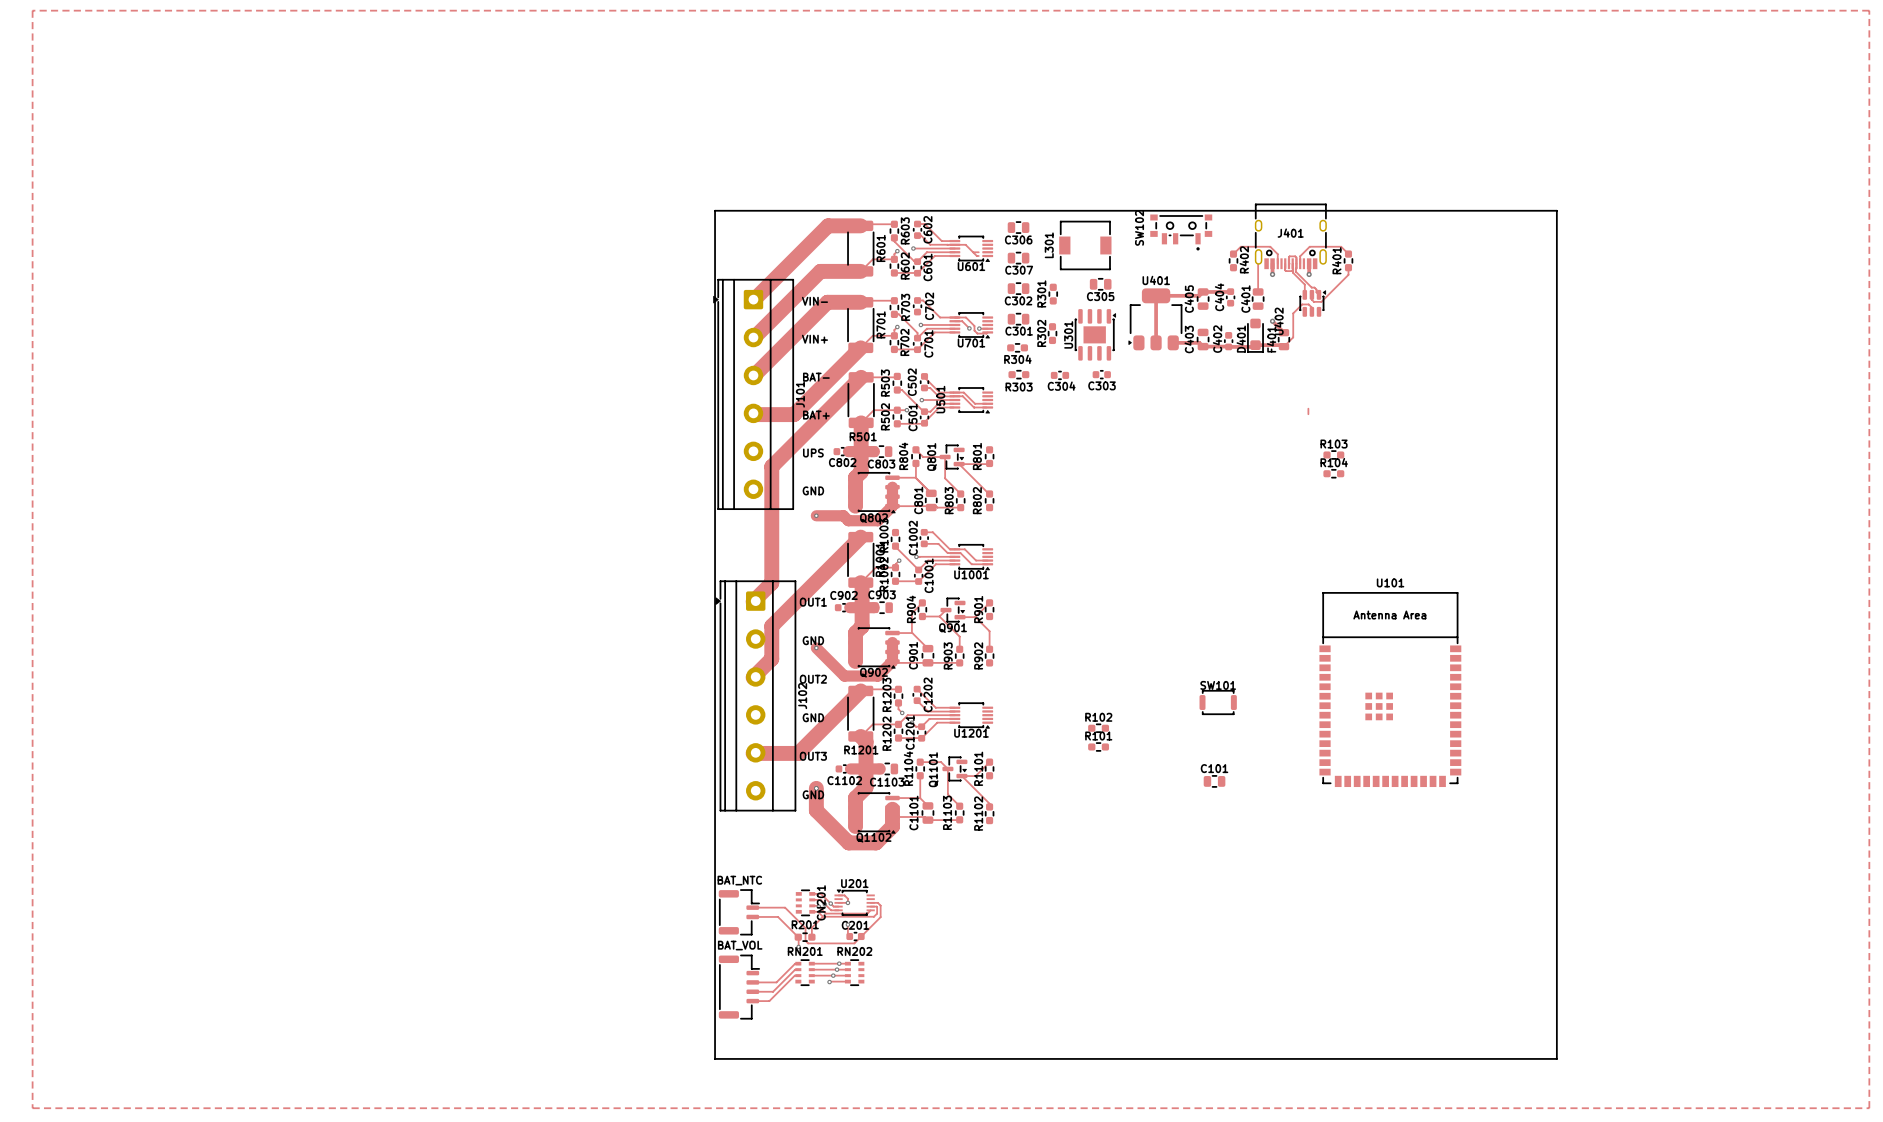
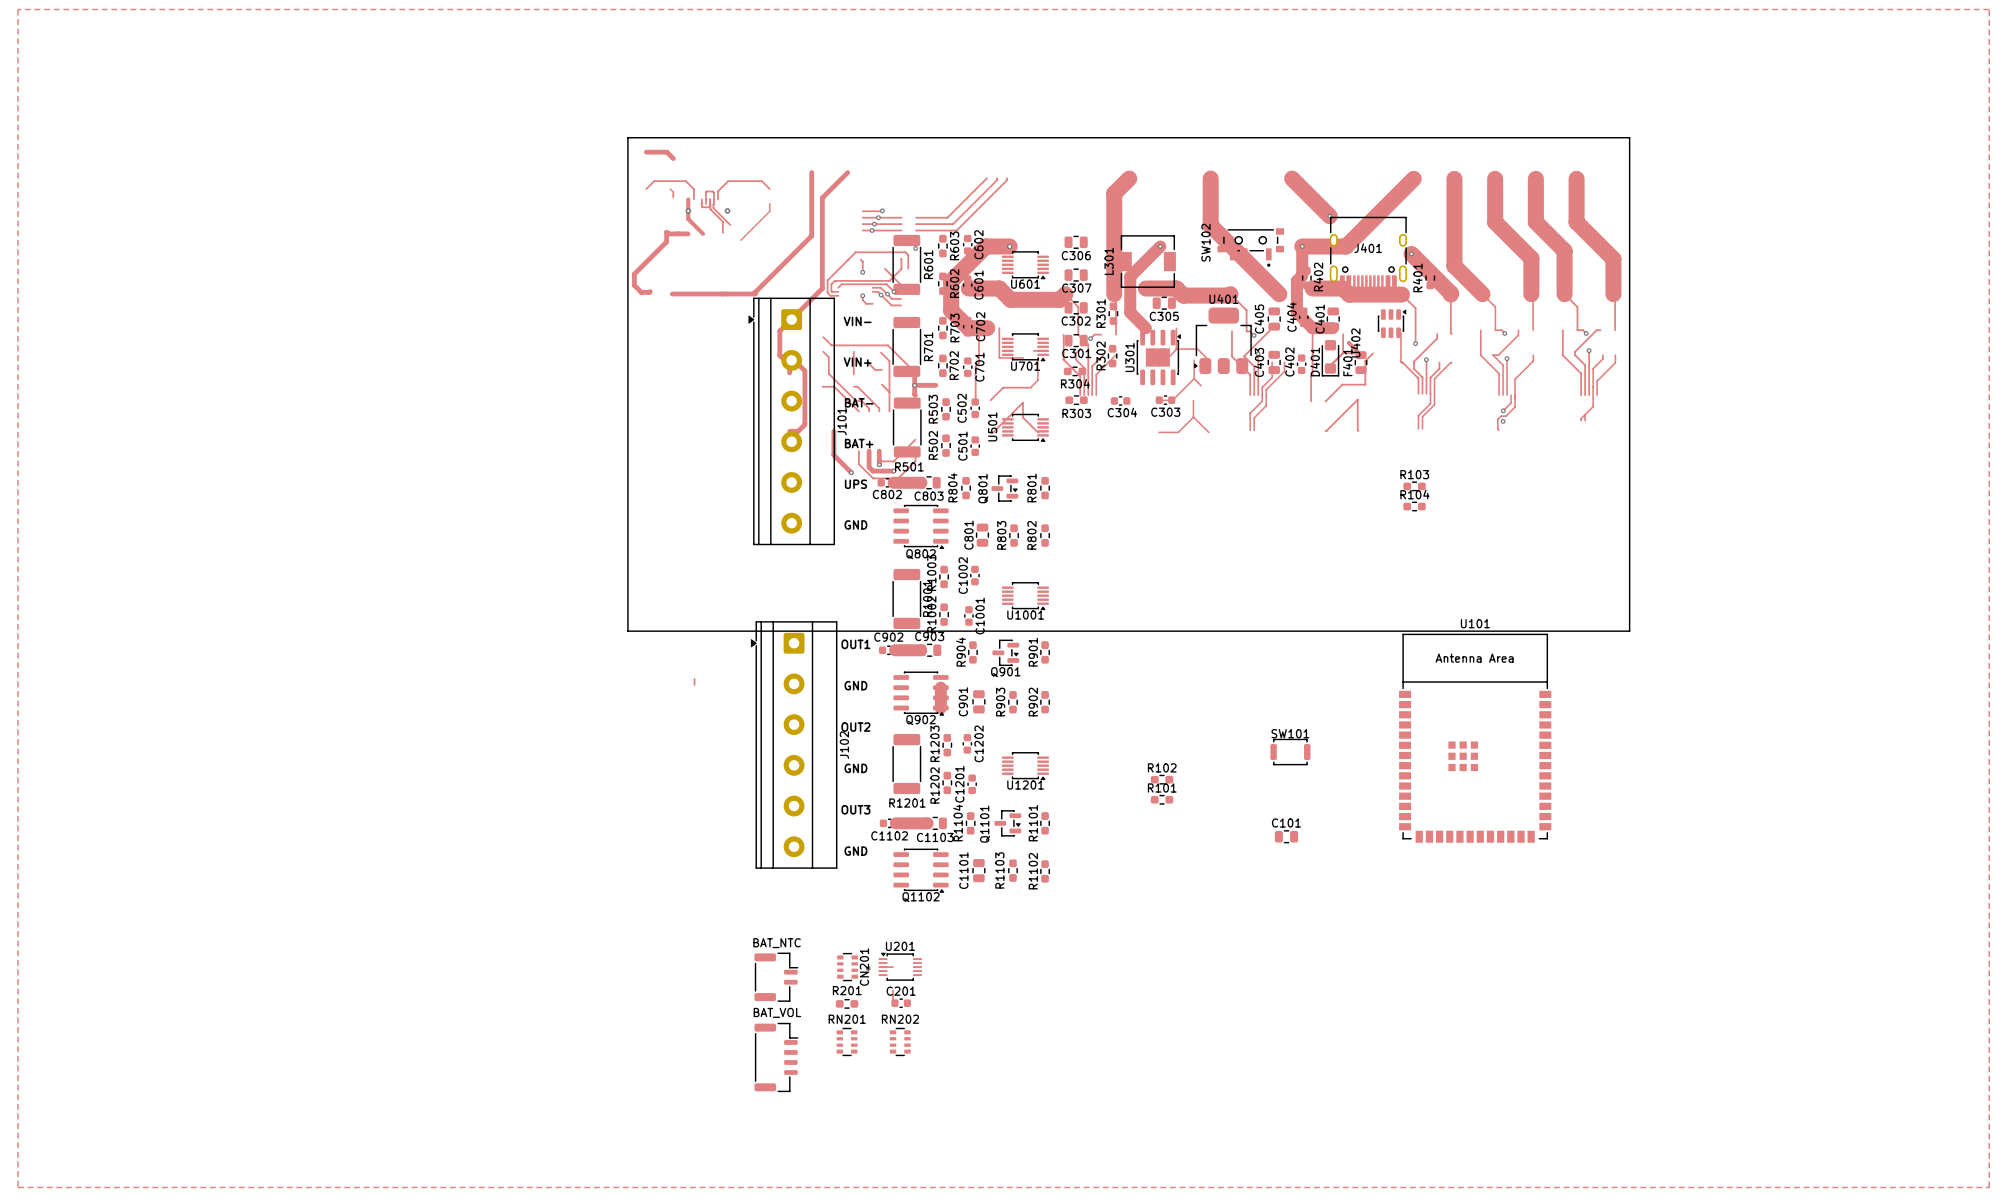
board edge: none -> (627, 137) (1629, 137) (1629, 631) (627, 631) (627, 137)
track: none -> (646, 152) (666, 152) (673, 158)
track: none -> (811, 172) (811, 235) (755, 293) (672, 293)
track: none -> (847, 172) (822, 198) (822, 288) (779, 331) (779, 355) (789, 365) (789, 372)
track: none -> (986, 178) (947, 217) (915, 217)
track: none -> (997, 178) (953, 224) (915, 224)
track: none -> (1007, 178) (956, 230) (915, 230)
track: none -> (1129, 178) (1114, 193) (1115, 334)
track: none -> (1210, 178) (1210, 225) (1279, 294)
track: none -> (1292, 178) (1329, 216)
track: none -> (1413, 178) (1346, 246) (1302, 246) (1302, 275) (1296, 280) (1296, 312) (1312, 328) (1332, 328)
track: none -> (1454, 178) (1454, 266) (1495, 307) (1495, 330) (1501, 330) (1504, 333)
track: none -> (1495, 178) (1495, 222) (1531, 258) (1531, 294)
track: none -> (1535, 178) (1535, 222) (1564, 250) (1564, 294) (1577, 307) (1577, 330) (1583, 330) (1586, 333)
track: none -> (1576, 178) (1576, 222) (1613, 259) (1613, 294)
track: none -> (646, 189) (654, 181) (685, 181) (693, 189) (693, 199)
track: none -> (670, 189) (673, 192) (673, 197)
track: none -> (769, 189) (761, 181) (728, 181) (717, 191) (717, 199)
track: none -> (688, 199) (688, 219) (703, 233)
track: none -> (701, 199) (702, 207) (709, 206) (709, 199)
track: none -> (705, 204) (705, 192) (712, 191) (713, 208) (730, 224)
track: none -> (709, 204) (710, 209) (722, 221) (722, 232)
track: none -> (769, 203) (769, 211) (740, 240)
via: none -> (688, 210)
via: none -> (727, 210)
track: none -> (882, 210) (862, 211)
via: none -> (882, 210)
via: none -> (1329, 216)
track: none -> (862, 217) (901, 217)
via: none -> (878, 217)
board edge: (715, 210) (1556, 210) (1556, 1058) (715, 1058) (715, 210) -> none
track: none -> (862, 224) (901, 224)
via: none -> (874, 224)
track: none -> (862, 230) (901, 230)
via: none -> (872, 230)
track: none -> (688, 233) (666, 232) (666, 241) (634, 274) (634, 285) (641, 292) (650, 291)
track: (862, 224) (894, 224) -> none
track: (917, 224) (924, 224) (941, 241) (954, 241) -> none
track: (860, 225) (828, 225) (753, 300) -> none
track: none -> (1009, 246) (985, 246) (951, 281) (951, 310) (968, 328) (987, 328)
via: none -> (1009, 246)
track: none -> (1160, 246) (1130, 276) (1130, 312) (1145, 328)
via: none -> (1160, 246)
via: none -> (1302, 246)
via: none -> (915, 248)
track: (917, 235) (921, 235) (930, 244) (947, 244) -> none
track: (894, 237) (894, 241) (914, 261) (917, 261) (926, 252) (954, 252) -> none
track: none -> (1411, 253) (1450, 293) (1451, 334)
via: none -> (1411, 253)
track: none -> (860, 259) (862, 261) (862, 272)
track: none -> (901, 259) (901, 269) (889, 280) (834, 280) (831, 284) (831, 291) (838, 291)
track: (947, 244) (965, 244) (978, 255) -> none
track: (913, 248) (954, 248) -> none
via: (913, 248) -> none
track: (897, 251) (894, 254) (894, 259) (872, 259) (860, 271) (820, 271) (753, 338) -> none
via: (897, 251) -> none
track: none -> (884, 268) (906, 290)
track: none -> (908, 268) (908, 255) (905, 252) (855, 252) (827, 280) (827, 292) (830, 295) (838, 295)
track: (973, 252) (978, 252) -> none
track: (1233, 254) (1240, 246) (1270, 246) (1277, 254) (1277, 263) -> none
track: (1348, 254) (1341, 246) (1309, 246) (1300, 256) (1300, 263) -> none
via: none -> (862, 272)
track: (954, 255) (934, 255) (917, 273) (894, 272) -> none
track: (1258, 256) (1258, 291) -> none
track: (1348, 267) (1348, 274) (1321, 301) (1313, 301) (1311, 294) -> none
track: (1288, 268) (1288, 257) (1295, 256) (1295, 271) (1311, 287) (1314, 287) (1318, 294) -> none
track: (1292, 268) (1293, 272) (1304, 284) (1304, 294) -> none
track: none -> (838, 287) (841, 284) (886, 284) (894, 292) (901, 292)
track: none -> (872, 287) (880, 287) (892, 299) (901, 299)
track: none -> (968, 288) (999, 288) (1010, 299) (1059, 299) (1065, 294) (1078, 307) (1078, 334) (1088, 344) (1088, 395)
track: none -> (1145, 288) (1176, 288) (1183, 295) (1230, 294) (1246, 310) (1246, 331) (1250, 331) (1254, 335)
track: none -> (1312, 288) (1343, 288) (1349, 294) (1401, 294) (1415, 308) (1415, 343)
track: none -> (872, 291) (878, 291) (891, 305) (901, 305)
via: none -> (893, 291)
via: (1272, 274) -> none
via: (1309, 274) -> none
via: none -> (887, 294)
via: none -> (881, 295)
track: none -> (862, 295) (862, 300) (866, 303) (872, 303)
via: none -> (862, 295)
track: none -> (1533, 295) (1533, 330)
track: none -> (1615, 295) (1615, 330)
track: (1159, 291) (1156, 294) (1156, 342) -> none
track: (1203, 291) (1199, 295) (1156, 295) -> none
track: (1230, 291) (1203, 291) -> none
track: (862, 300) (894, 300) -> none
track: (917, 300) (923, 300) (940, 317) (965, 317) (974, 326) (974, 330) (977, 333) (987, 332) -> none
track: (860, 302) (827, 302) (753, 376) -> none
track: none -> (999, 328) (999, 357) (1023, 357)
track: none -> (1176, 328) (1176, 349) (1159, 366)
track: none -> (1480, 330) (1480, 355) (1499, 373) (1499, 395)
track: none -> (1518, 330) (1518, 335) (1498, 355) (1492, 355) (1503, 365) (1503, 395)
track: none -> (1562, 330) (1562, 355) (1581, 373) (1581, 395)
track: none -> (1600, 330) (1596, 330) (1575, 351) (1575, 355) (1585, 365) (1585, 395)
track: none -> (975, 331) (978, 328) (978, 362) (975, 366) (975, 400)
track: none -> (1231, 331) (1231, 356) (1250, 374) (1250, 395)
track: none -> (1269, 331) (1244, 356) (1254, 366) (1254, 395)
track: (1311, 311) (1311, 307) (1308, 304) (1302, 304) (1293, 313) (1293, 337) (1283, 346) (1282, 345) (1203, 346) (1199, 342) (1173, 342) -> none
track: none -> (1400, 333) (1400, 361) (1418, 378) (1418, 393)
via: none -> (1504, 333)
via: none -> (1586, 333)
track: none -> (1063, 334) (1063, 359) (1080, 376) (1080, 395)
track: none -> (1101, 334) (1094, 334) (1090, 338)
track: none -> (1312, 334) (1311, 401)
track: none -> (1343, 334) (1343, 353) (1326, 369)
track: none -> (1437, 334) (1437, 338) (1413, 361) (1413, 368) (1422, 377) (1422, 393)
track: (894, 314) (898, 314) (917, 332) (917, 338) (926, 328) (954, 328) -> none
via: none -> (1254, 335)
track: none -> (823, 337) (831, 345) (887, 345) (915, 372) (915, 395)
via: none -> (1090, 338)
track: (954, 321) (962, 321) (969, 328) -> none
via: (1272, 321) -> none
via: none -> (1415, 343)
track: (920, 324) (954, 324) -> none
via: (920, 324) -> none
track: (897, 327) (894, 330) (894, 335) (872, 335) (794, 414) (753, 414) -> none
via: (897, 327) -> none
track: none -> (1080, 349) (1075, 353) (1075, 359) (1084, 367) (1084, 395)
track: none -> (1176, 349) (1197, 349) (1208, 360)
via: (969, 328) -> none
via: (979, 328) -> none
track: none -> (1589, 350) (1589, 395)
via: none -> (1589, 350)
track: none -> (823, 351) (828, 357) (828, 373) (856, 401) (861, 401) (869, 408) (869, 411)
track: none -> (853, 351) (853, 374)
track: none -> (881, 352) (889, 361) (889, 411)
track: none -> (789, 353) (788, 363) (797, 363) (804, 370) (804, 424) (798, 431) (789, 431)
via: none -> (1258, 353)
track: none -> (1342, 353) (1358, 353)
track: none -> (1373, 353) (1365, 361) (1365, 384) (1342, 384) (1325, 401)
track: (954, 332) (934, 332) (917, 349) (894, 349) -> none
track: none -> (1103, 354) (1092, 366) (1092, 395)
track: none -> (1116, 354) (1096, 374) (1096, 395)
track: none -> (1533, 355) (1533, 361) (1515, 379) (1515, 407) (1505, 416) (1500, 416) (1497, 419) (1499, 430)
track: none -> (1602, 355) (1602, 358) (1593, 368) (1593, 387)
track: none -> (1615, 355) (1615, 362) (1597, 381) (1597, 395)
track: none -> (1258, 357) (1258, 395)
track: none -> (1037, 357) (1037, 380) (1030, 387) (1003, 387) (990, 400)
track: none -> (1507, 358) (1507, 395)
via: none -> (1507, 358)
via: none -> (1426, 359)
track: none -> (1194, 360) (1194, 378)
track: none -> (1426, 359) (1426, 393)
track: none -> (1272, 362) (1272, 377) (1262, 387) (1262, 401) (1250, 413) (1250, 430)
track: none -> (1284, 362) (1284, 371) (1266, 389) (1266, 405) (1254, 417) (1254, 430)
track: none -> (1439, 362) (1439, 368) (1430, 377) (1430, 394)
track: none -> (1451, 362) (1434, 378) (1434, 404) (1422, 416) (1422, 428)
track: none -> (869, 364) (875, 369) (881, 369)
track: none -> (1194, 378) (1201, 385)
track: none -> (1194, 378) (1172, 400) (1158, 400)
track: none -> (881, 384) (889, 392)
track: none -> (914, 385) (935, 385)
via: none -> (914, 385)
track: none -> (822, 386) (834, 386) (858, 411)
track: none -> (853, 386) (857, 386) (879, 408) (879, 411)
track: none -> (1593, 387) (1593, 406) (1581, 420)
track: none -> (1430, 393) (1430, 403) (1418, 415)
track: none -> (1511, 395) (1511, 403) (1503, 410)
track: none -> (1193, 400) (1193, 417) (1208, 432)
track: (897, 376) (861, 377) (771, 466) (771, 583) (753, 601) -> none
track: (924, 376) (939, 392) (963, 392) (975, 403) (986, 403) -> none
via: none -> (1503, 410)
track: (924, 387) (930, 387) (938, 396) (953, 396) -> none
track: none -> (1418, 415) (1418, 428)
track: (897, 390) (902, 390) (923, 411) (930, 411) (938, 403) (953, 403) -> none
track: none -> (1193, 417) (1178, 432) (1158, 432)
via: none -> (1503, 421)
track: (953, 396) (962, 396) (974, 407) -> none
track: (921, 400) (953, 400) -> none
via: (921, 400) -> none
track: none -> (833, 431) (833, 455) (851, 472)
track: none -> (1325, 431) (1357, 399) (1358, 431)
track: none -> (989, 432) (993, 432) (1022, 402) (1022, 417) (1037, 432)
track: (953, 407) (939, 407) (923, 423) (897, 423) -> none
track: (974, 407) (986, 407) -> none
track: (1308, 408) (1308, 414) -> (1585, 414) (1585, 420)
track: (906, 410) (873, 410) (861, 422) (861, 472) (855, 477) (855, 506) -> none
via: (906, 410) -> none
track: none -> (915, 439) (893, 461) (881, 461) (879, 458) (879, 451) (879, 464) (879, 464)
track: none -> (858, 451) (858, 464) (873, 478) (898, 478) (915, 461) (915, 454)
track: none -> (869, 451) (869, 467) (873, 471) (893, 471)
via: none -> (879, 464)
via: none -> (893, 471)
via: none -> (851, 472)
track: (915, 449) (923, 457) (945, 457) (945, 478) (960, 493) -> none
track: (915, 463) (915, 478) -> none
track: (988, 463) (959, 464) (988, 493) -> none
track: (898, 477) (915, 477) (931, 493) -> none
track: (892, 487) (892, 506) (877, 520) (848, 520) (843, 515) (816, 515) -> none
track: (898, 506) (960, 507) -> none
via: (816, 515) -> none
track: (924, 532) (932, 532) (949, 549) (964, 549) (976, 560) (987, 560) -> none
track: (860, 537) (771, 626) (771, 658) (753, 677) -> none
track: (924, 543) (938, 543) (947, 553) (960, 553) (971, 564) (987, 564) -> none
track: (895, 546) (918, 569) (928, 560) (954, 560) -> none
via: (916, 556) -> none
track: (919, 556) (954, 556) -> none
track: (899, 560) (895, 564) (895, 567) (875, 567) (860, 582) (862, 626) (855, 633) (855, 661) -> none
via: (899, 560) -> none
track: (954, 564) (935, 564) (918, 581) (895, 581) -> none
track: (922, 602) (911, 613) (911, 633) -> none
track: (989, 602) (975, 617) (960, 617) -> none
track: (946, 610) (939, 616) -> none
track: (922, 616) (939, 616) -> none
track: (939, 616) (959, 636) (959, 649) -> none
track: (975, 617) (989, 631) (989, 649) -> none
track: (892, 633) (912, 633) (927, 648) -> none
track: none -> (694, 679) (694, 684)
track: (816, 648) (844, 676) (877, 676) (892, 661) (959, 662) -> none
via: (816, 648) -> none
track: (898, 689) (862, 689) (798, 753) (753, 753) -> none
track: (917, 689) (935, 707) (954, 707) -> none
track: (917, 700) (928, 711) (954, 711) -> none
track: (898, 702) (898, 709) (902, 712) -> none
via: (902, 712) -> none
track: (954, 715) (907, 715) (898, 724) (872, 724) (860, 736) (866, 741) (866, 787) (855, 798) (855, 826) -> none
track: (954, 718) (929, 718) (921, 726) (916, 726) (911, 722) -> none
via: (911, 722) -> none
track: (954, 722) (937, 722) (921, 738) (898, 738) -> none
track: (920, 762) (941, 762) (947, 768) (947, 794) (959, 806) -> none
track: (989, 762) (975, 776) (961, 776) (989, 803) (989, 806) -> none
track: (920, 775) (920, 798) -> none
track: (816, 788) (816, 810) (848, 842) (876, 842) (892, 826) (892, 809) -> none
via: (816, 788) -> none
track: (892, 798) (920, 798) -> none
track: (920, 798) (927, 805) -> none
track: (959, 819) (927, 820) (924, 817) (892, 817) (895, 820) -> none
track: (812, 893) (821, 893) (833, 906) (838, 906) -> none
track: (838, 895) (844, 895) (847, 898) (847, 902) -> none
track: (812, 899) (820, 899) (831, 910) (838, 910) -> none
via: (847, 902) -> none
track: (870, 902) (877, 902) (880, 905) (880, 917) (854, 943) (808, 943) (805, 940) (805, 928) (785, 907) (752, 907) -> none
via: (830, 903) -> none
track: (812, 905) (818, 905) (825, 913) (867, 913) (870, 910) -> none
via: (818, 906) -> none
track: (870, 906) (877, 907) (877, 913) (873, 916) (822, 916) -> none
track: (812, 911) (818, 911) (822, 916) -> none
track: (752, 916) (778, 916) (798, 937) (798, 946) -> none
track: (822, 916) (811, 927) (812, 936) -> none
via: (847, 924) -> none
via: (798, 946) -> none
track: (798, 963) (795, 963) (776, 982) (752, 982) -> none
track: (811, 963) (847, 963) -> none
via: (839, 963) -> none
track: (798, 969) (795, 969) (773, 991) (752, 991) -> none
track: (811, 969) (847, 969) -> none
via: (837, 969) -> none
track: (798, 975) (794, 975) (769, 1001) (752, 1001) -> none
track: (811, 975) (847, 975) -> none
via: (833, 975) -> none
track: (847, 981) (829, 982) -> none
via: (829, 982) -> none

